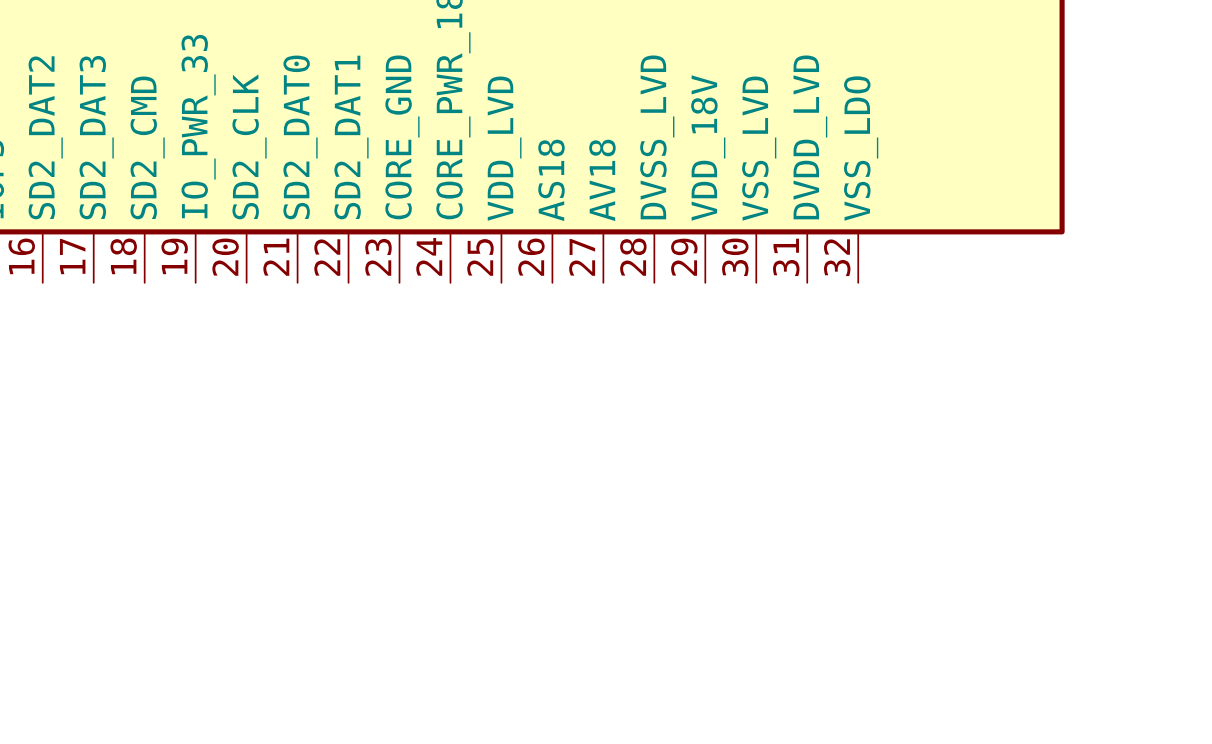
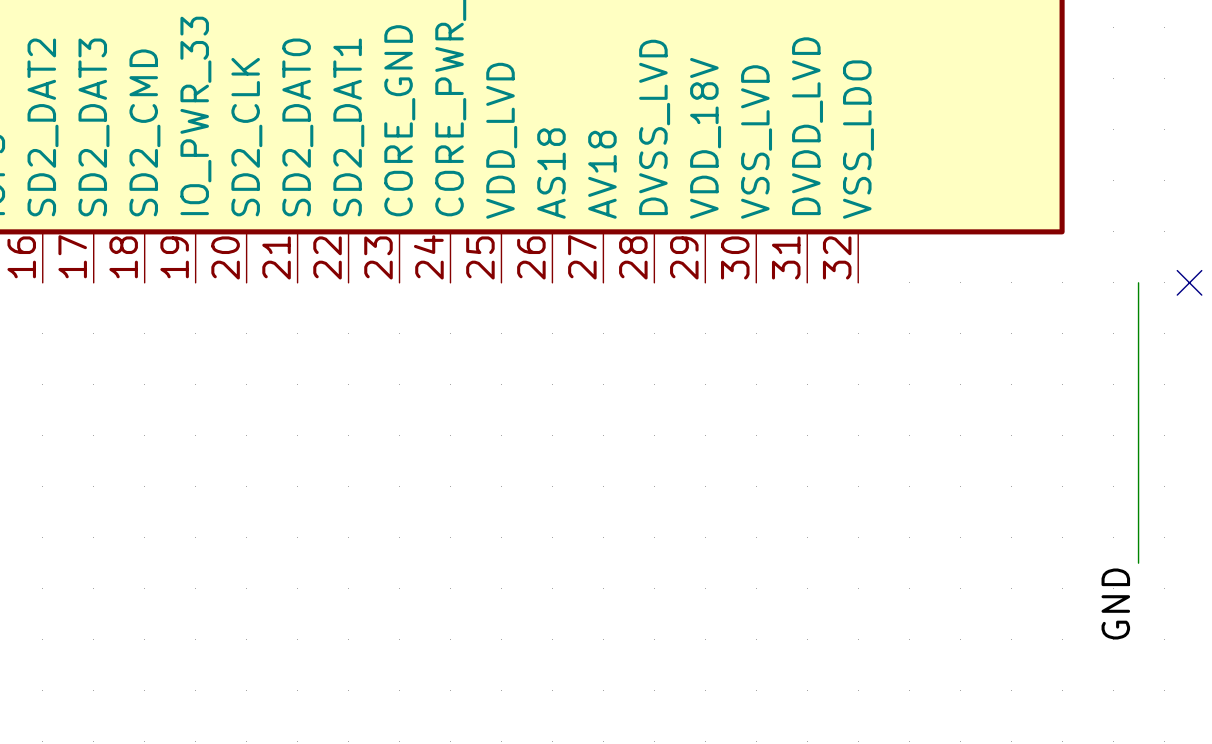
wire: none -> (1138, 282) (1138, 563)
no-connect mark: none -> (1189, 282)
label: none -> GND (1115, 604)

